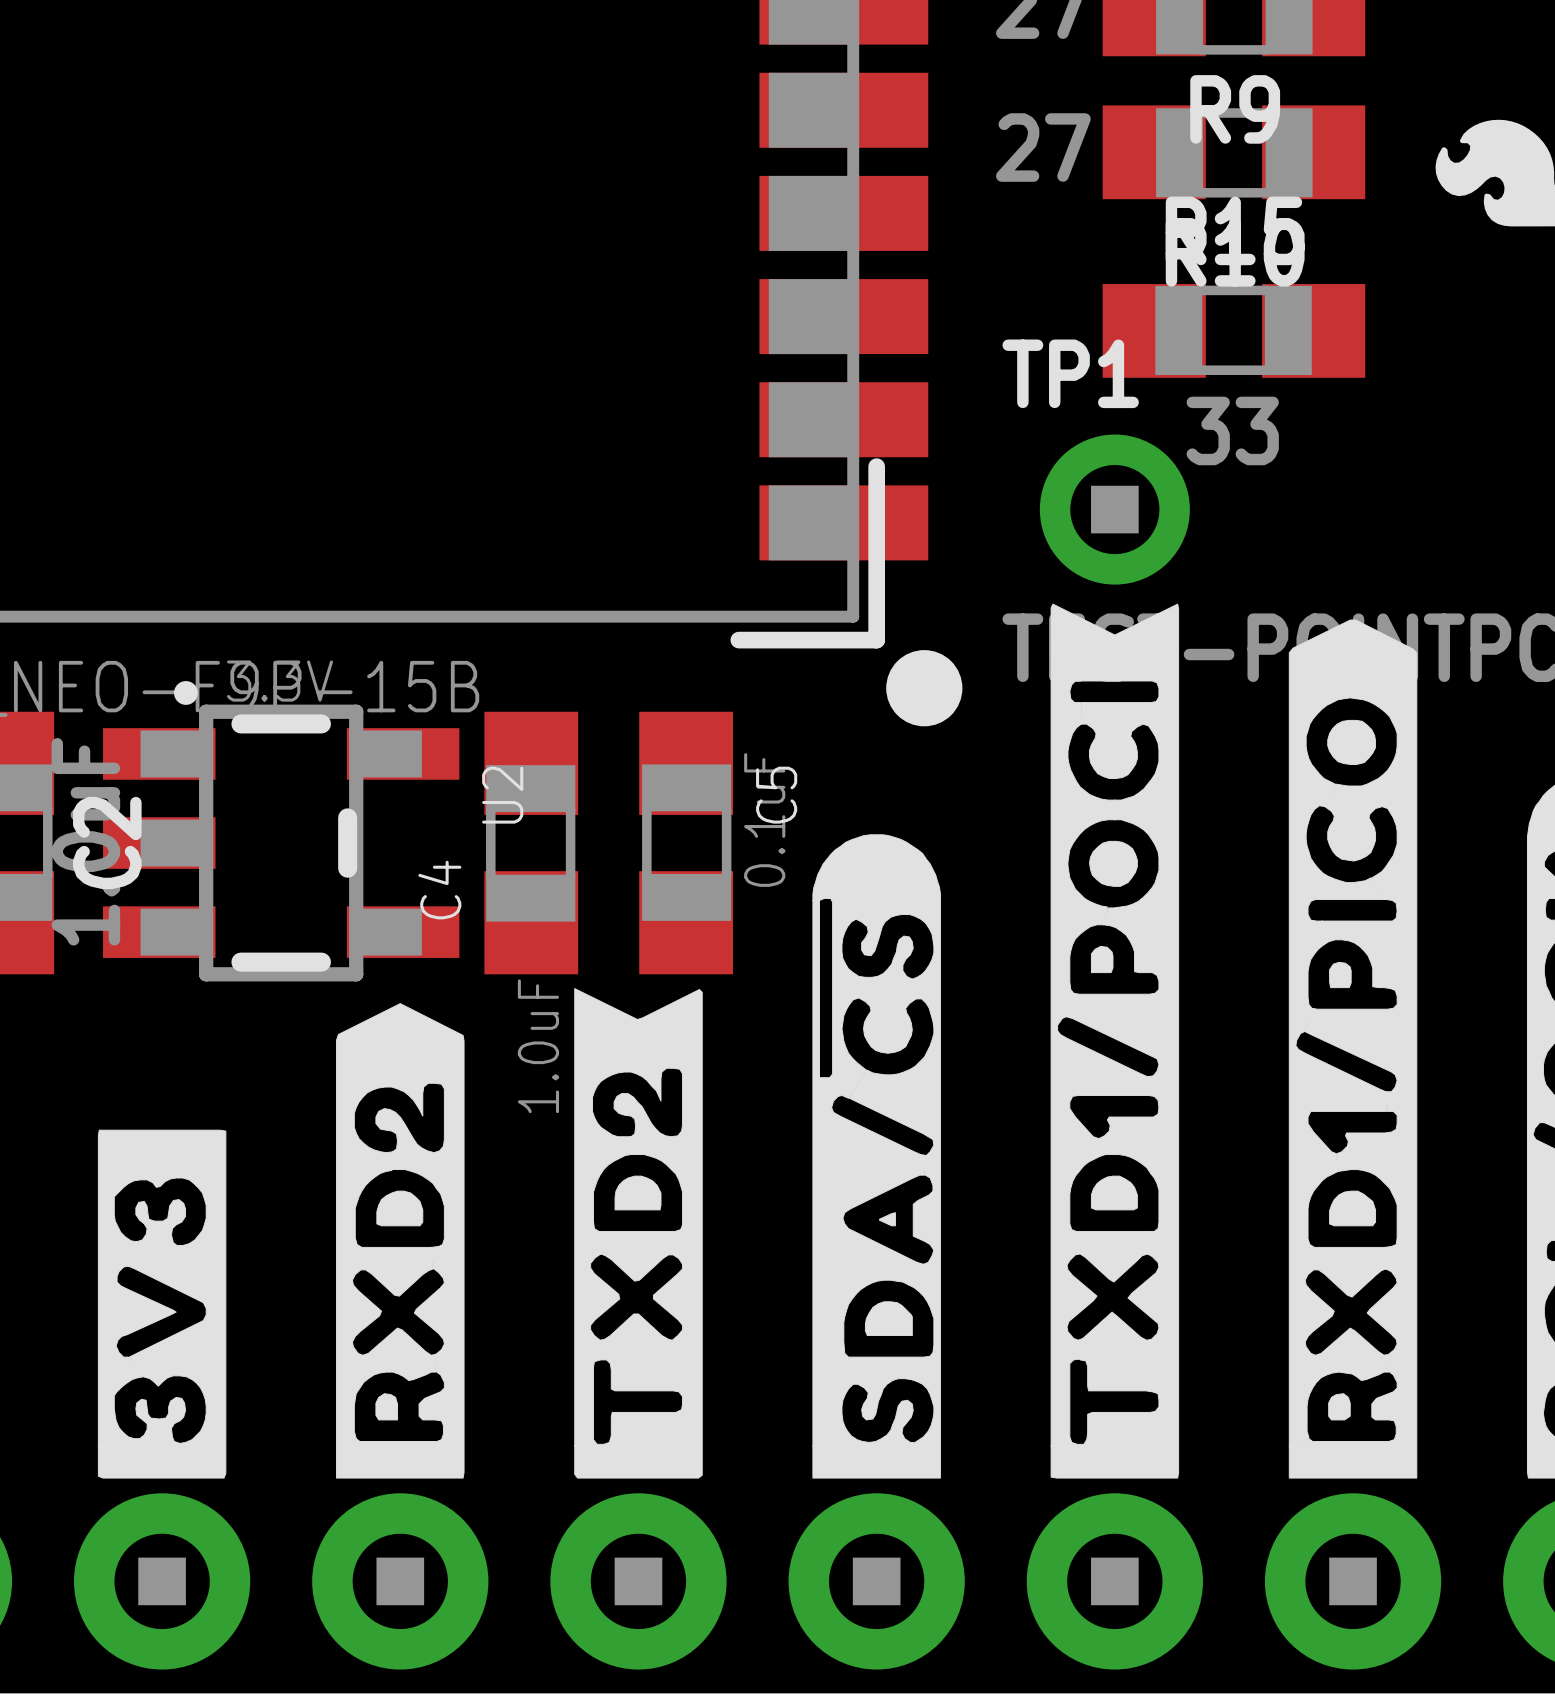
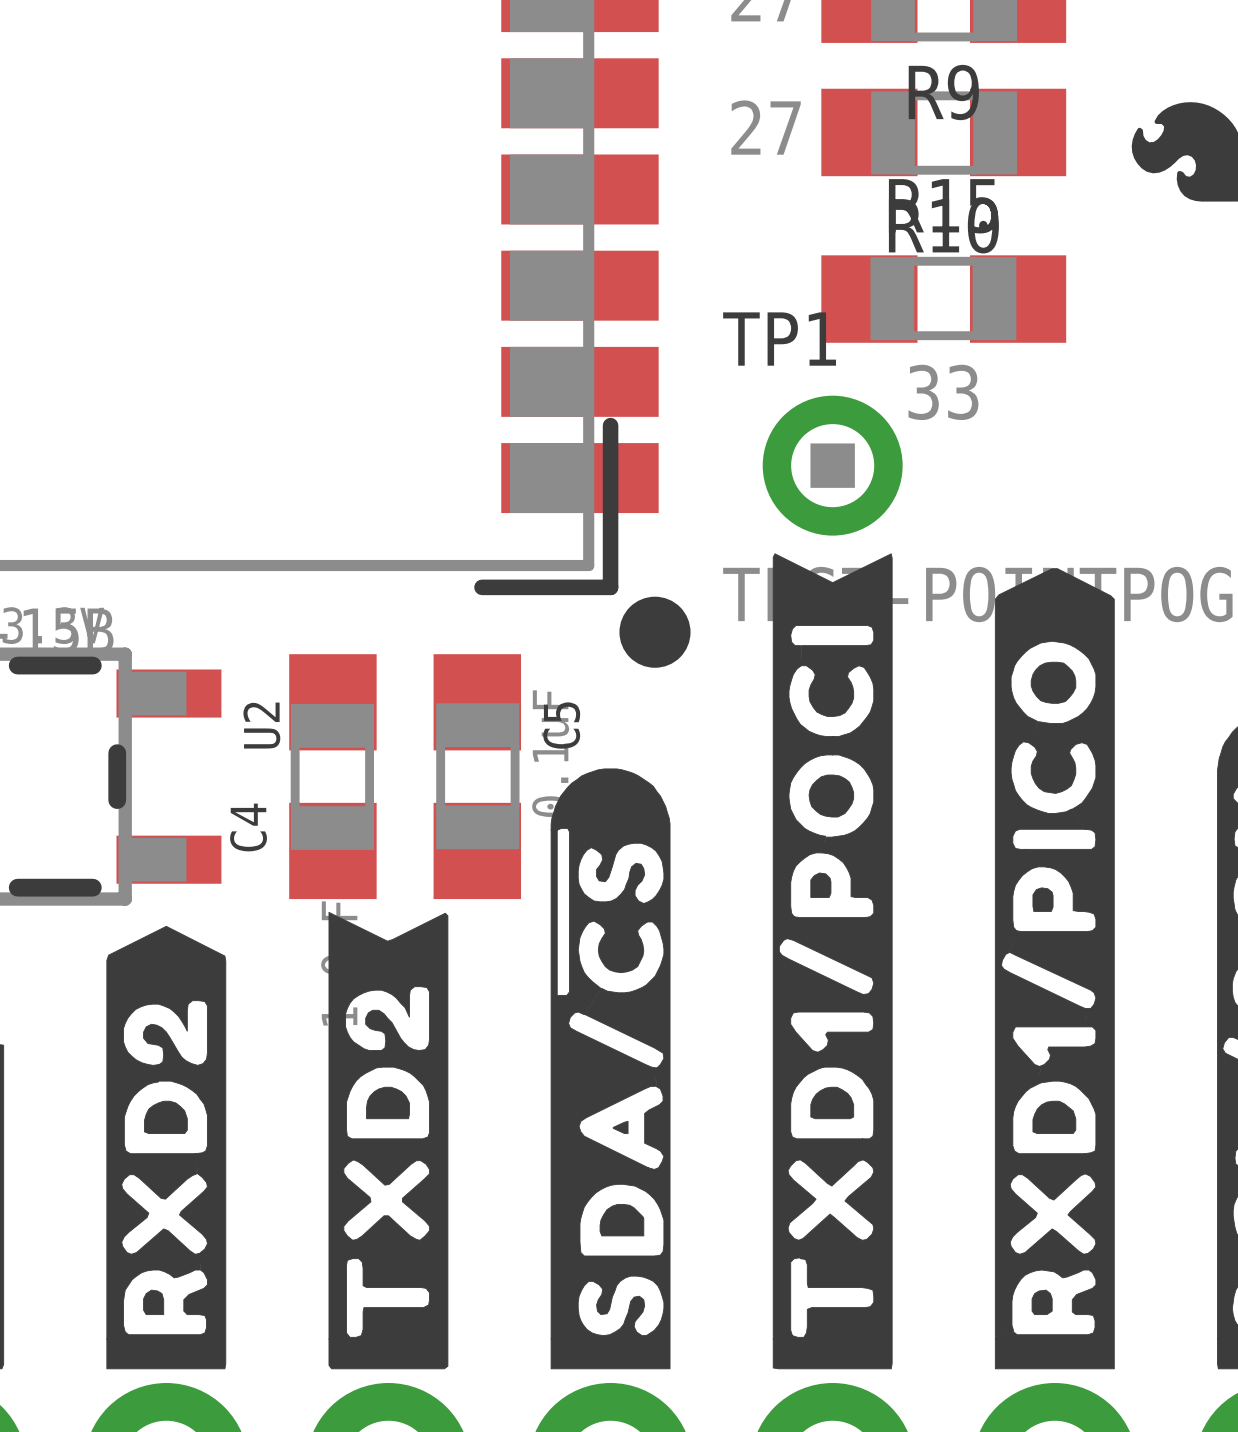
C4 position: (531, 843) -> (332, 776)
C5 position: (686, 843) -> (477, 776)

